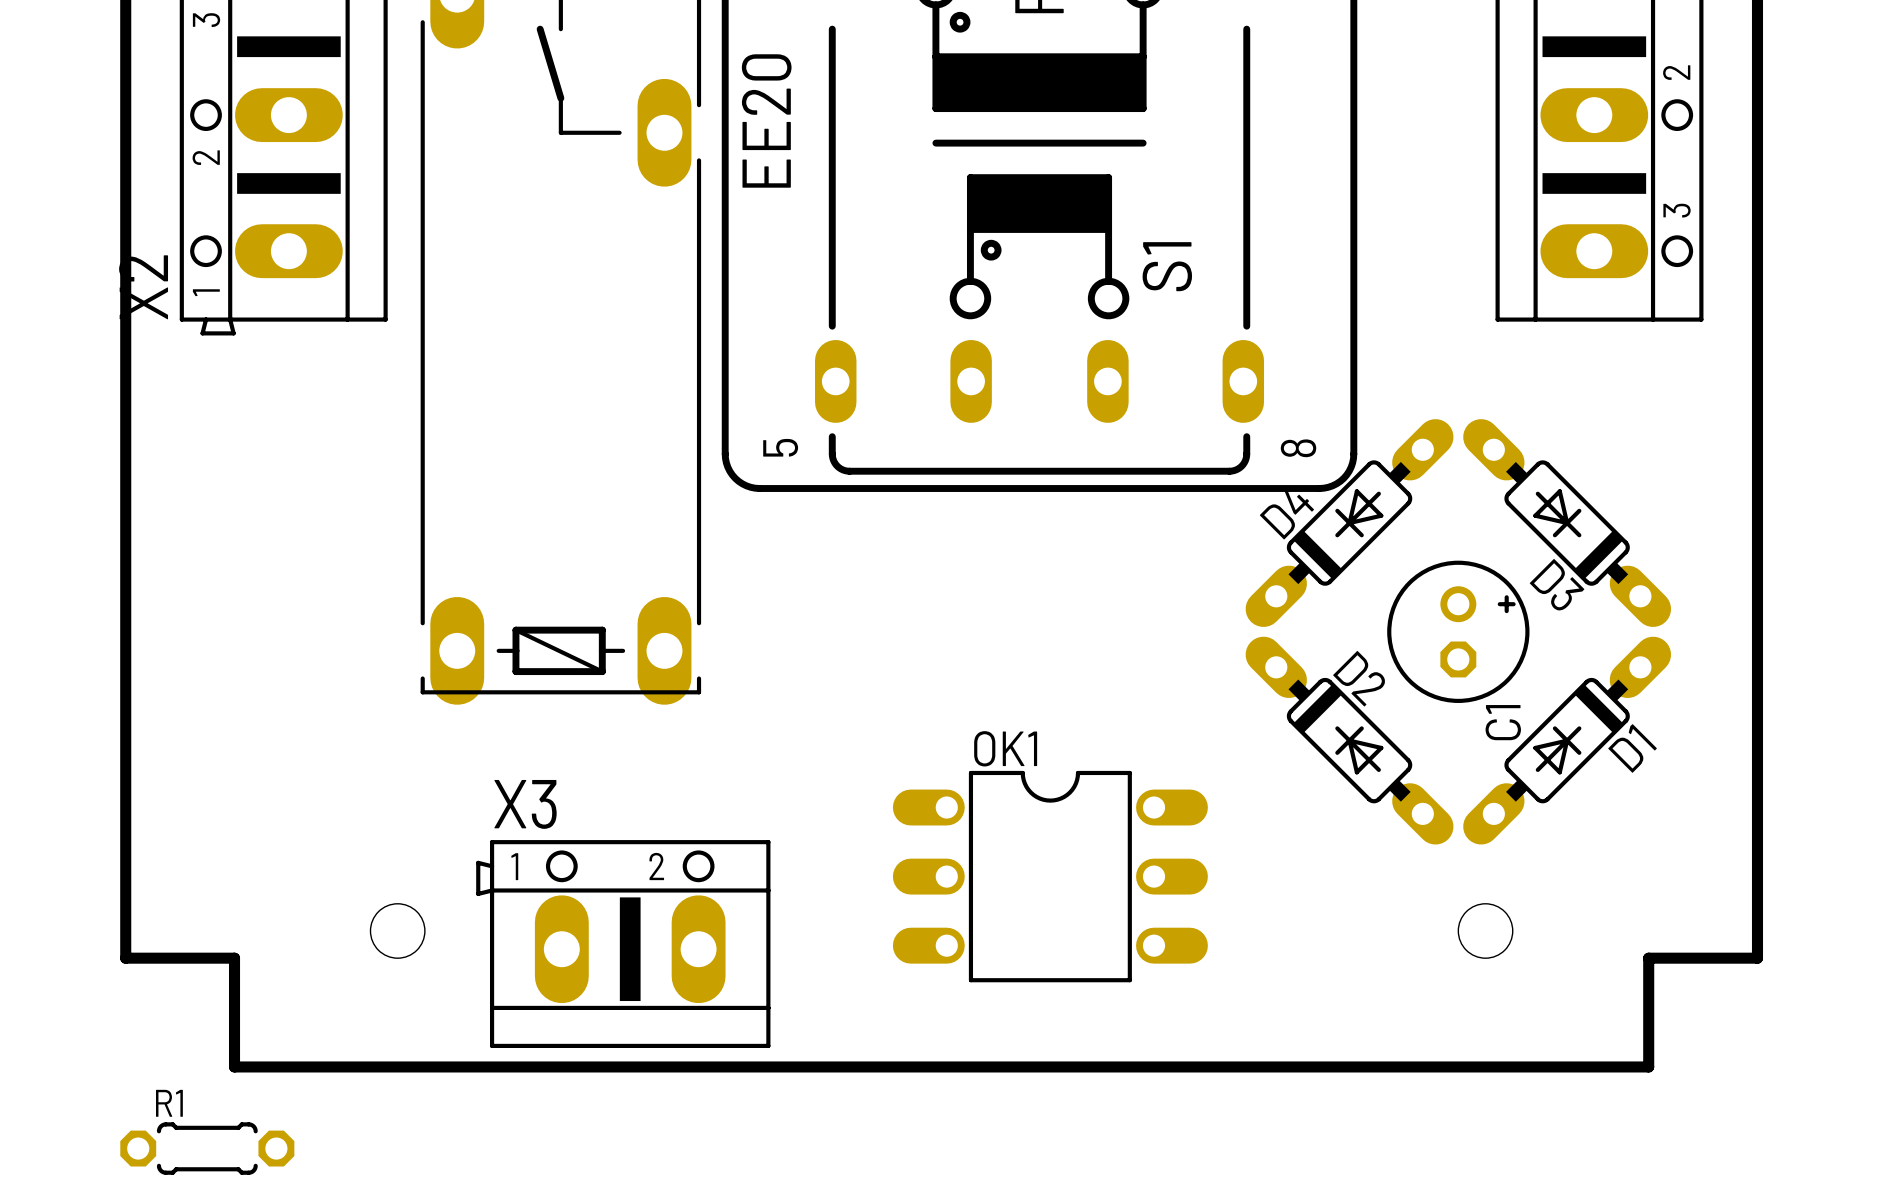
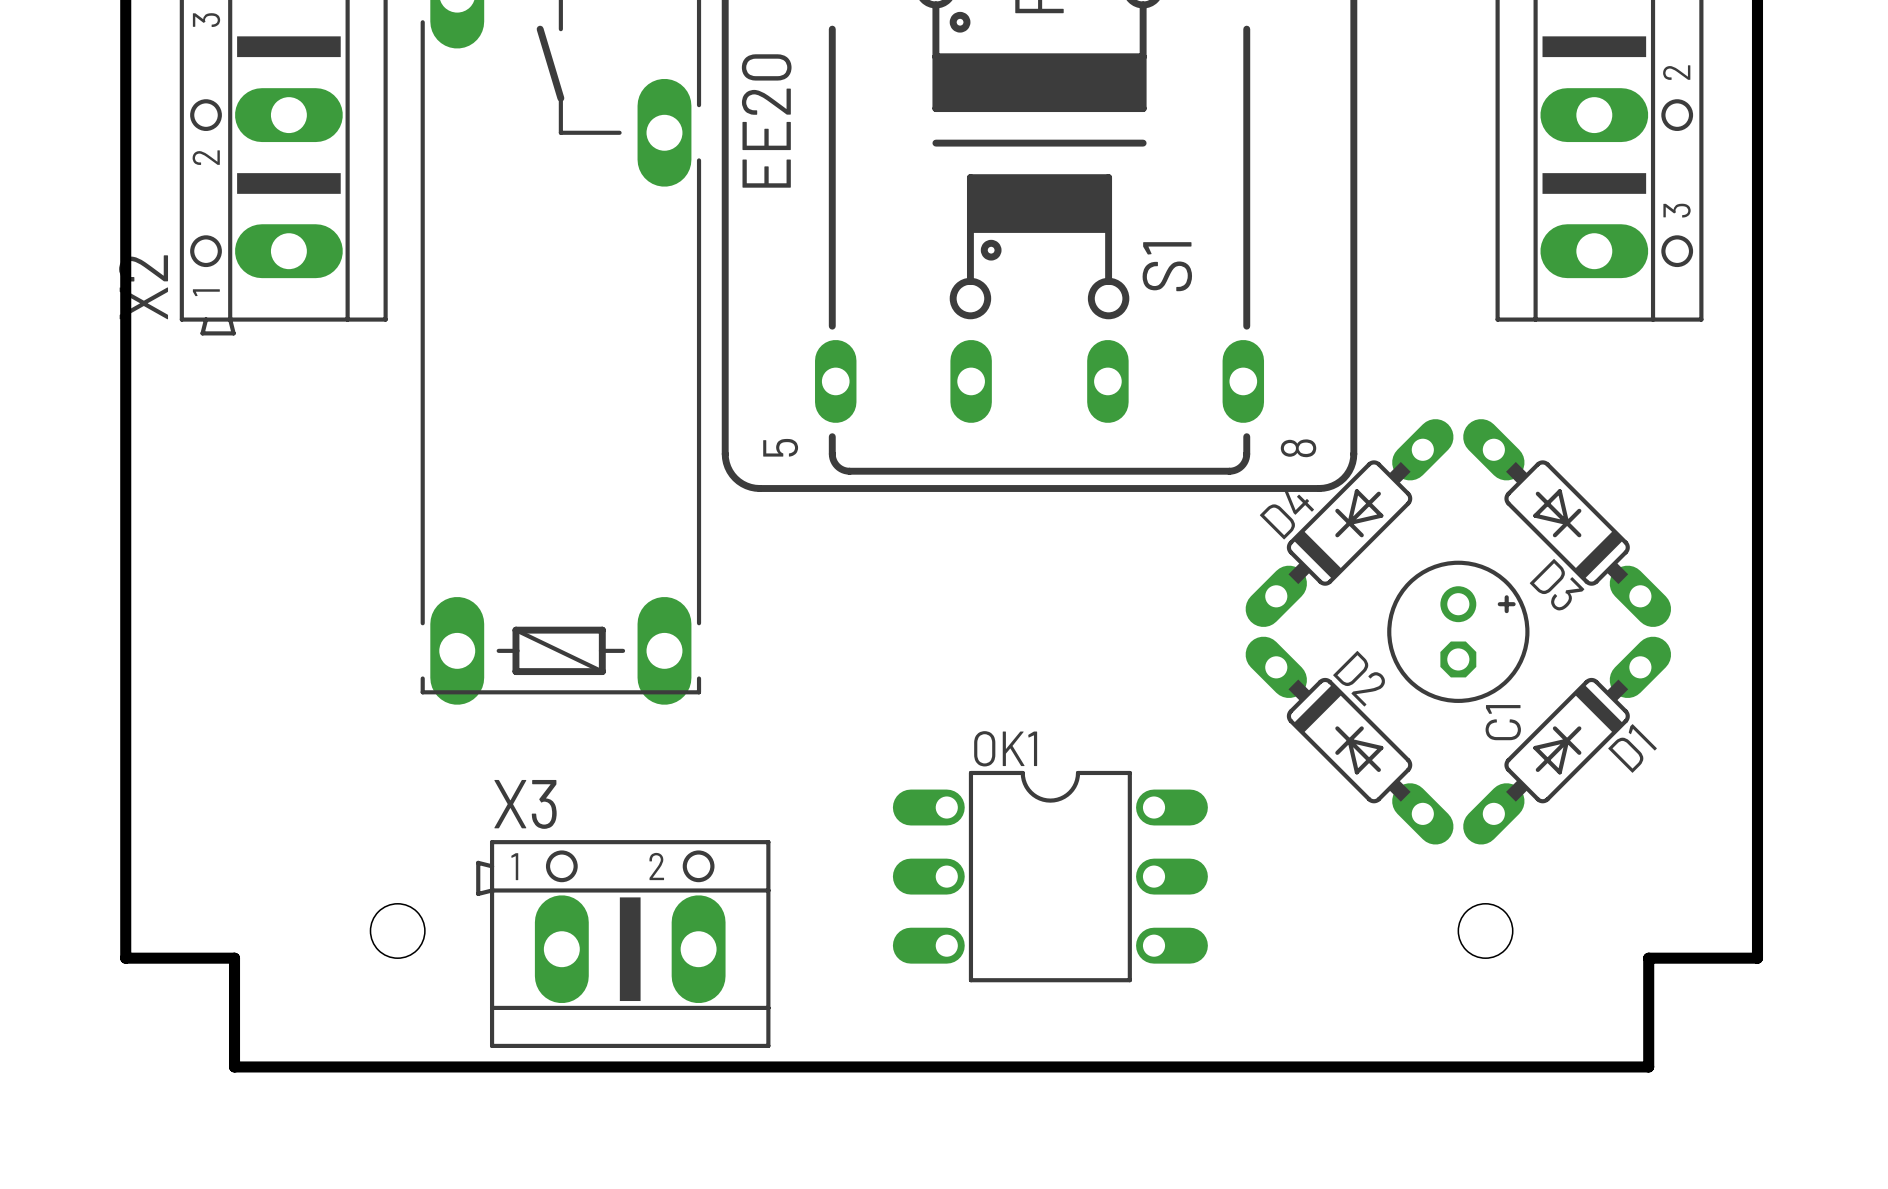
R1: (207, 1148) -> none

